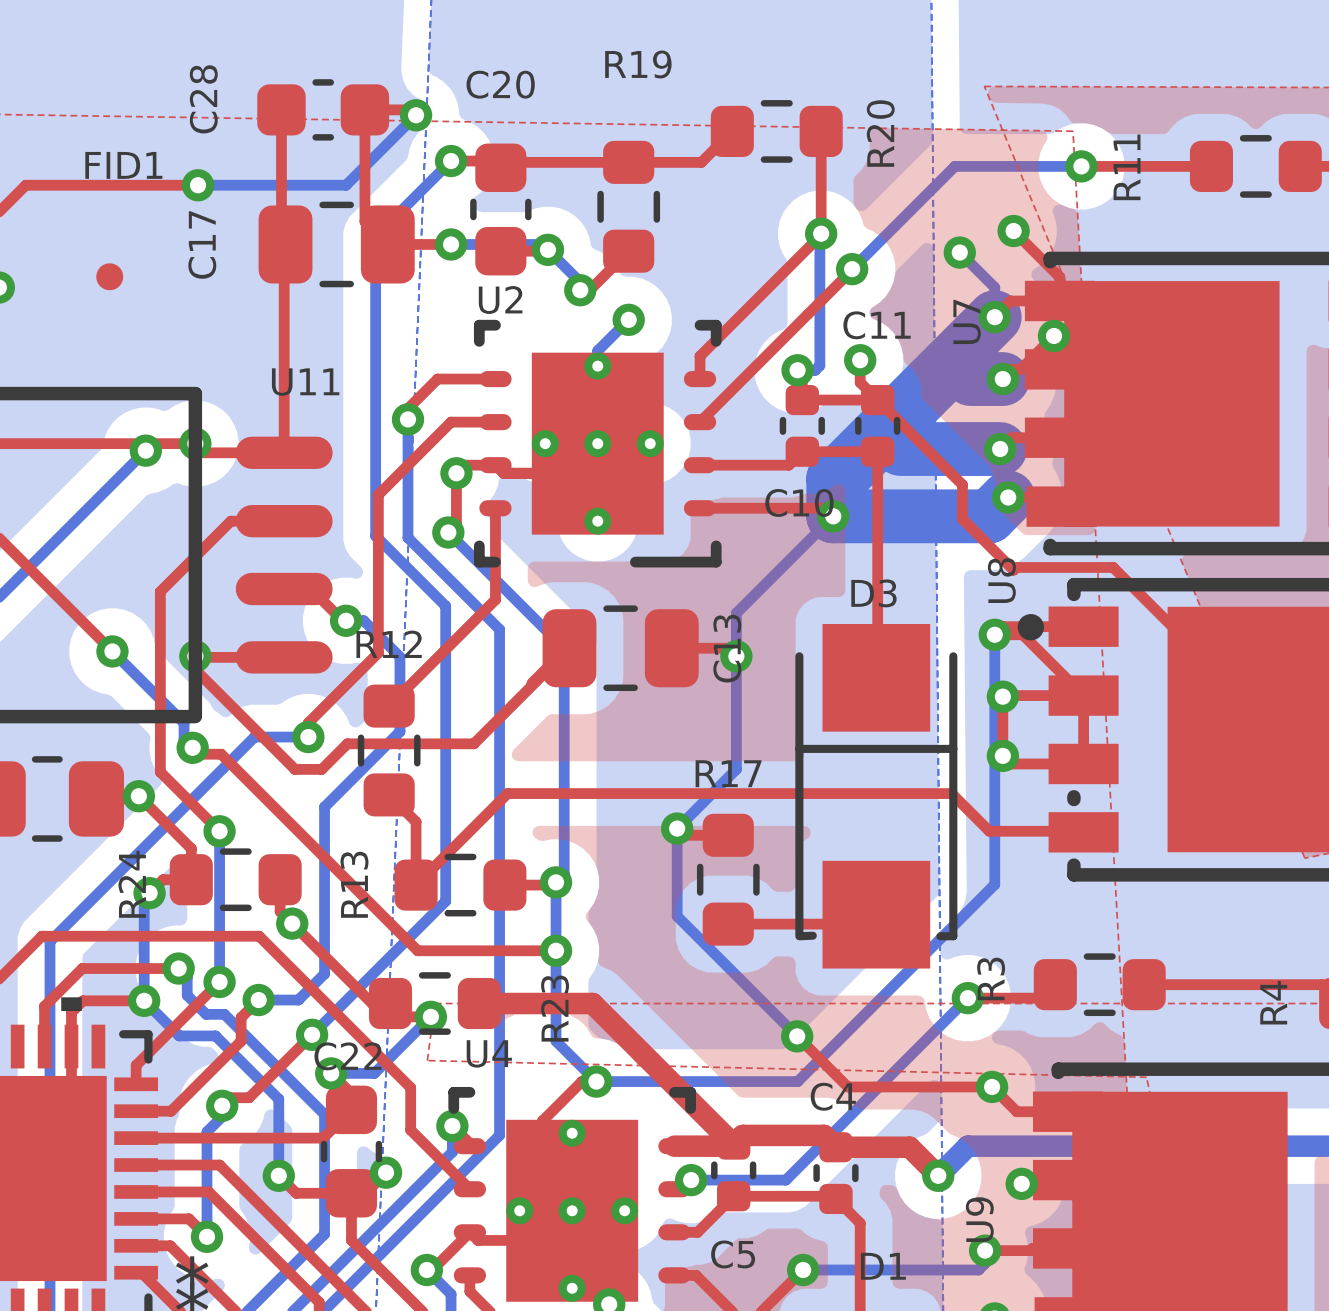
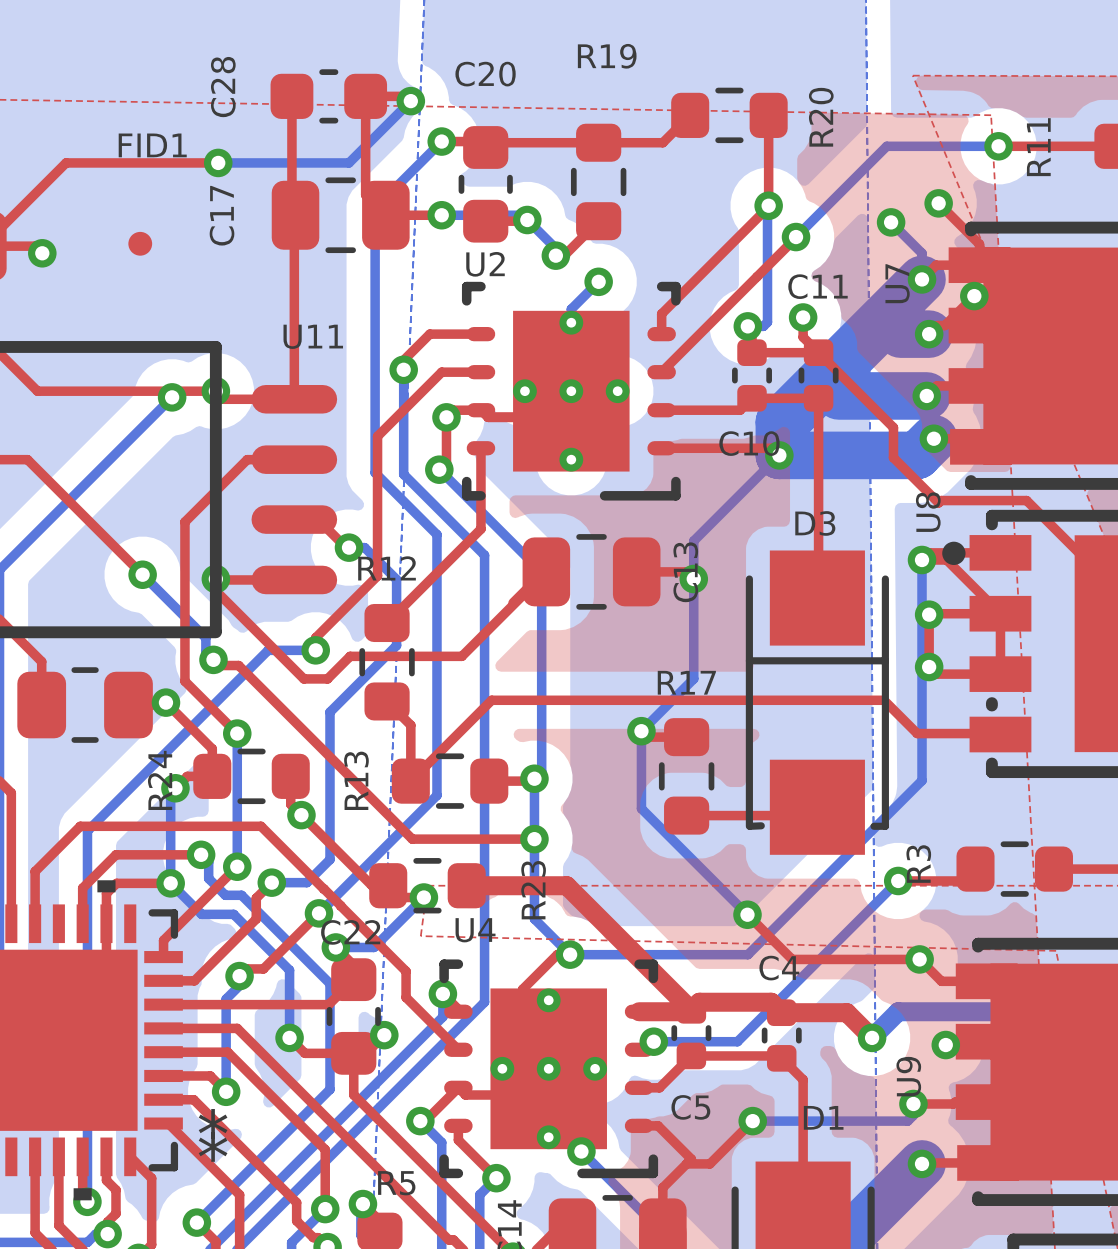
top track: (246, 936) (259, 936) (410, 1087) (410, 1100) -> (340, 906) (406, 971)
top track: none -> (261, 826) (323, 889)
top track: none -> (324, 889) (340, 905)

